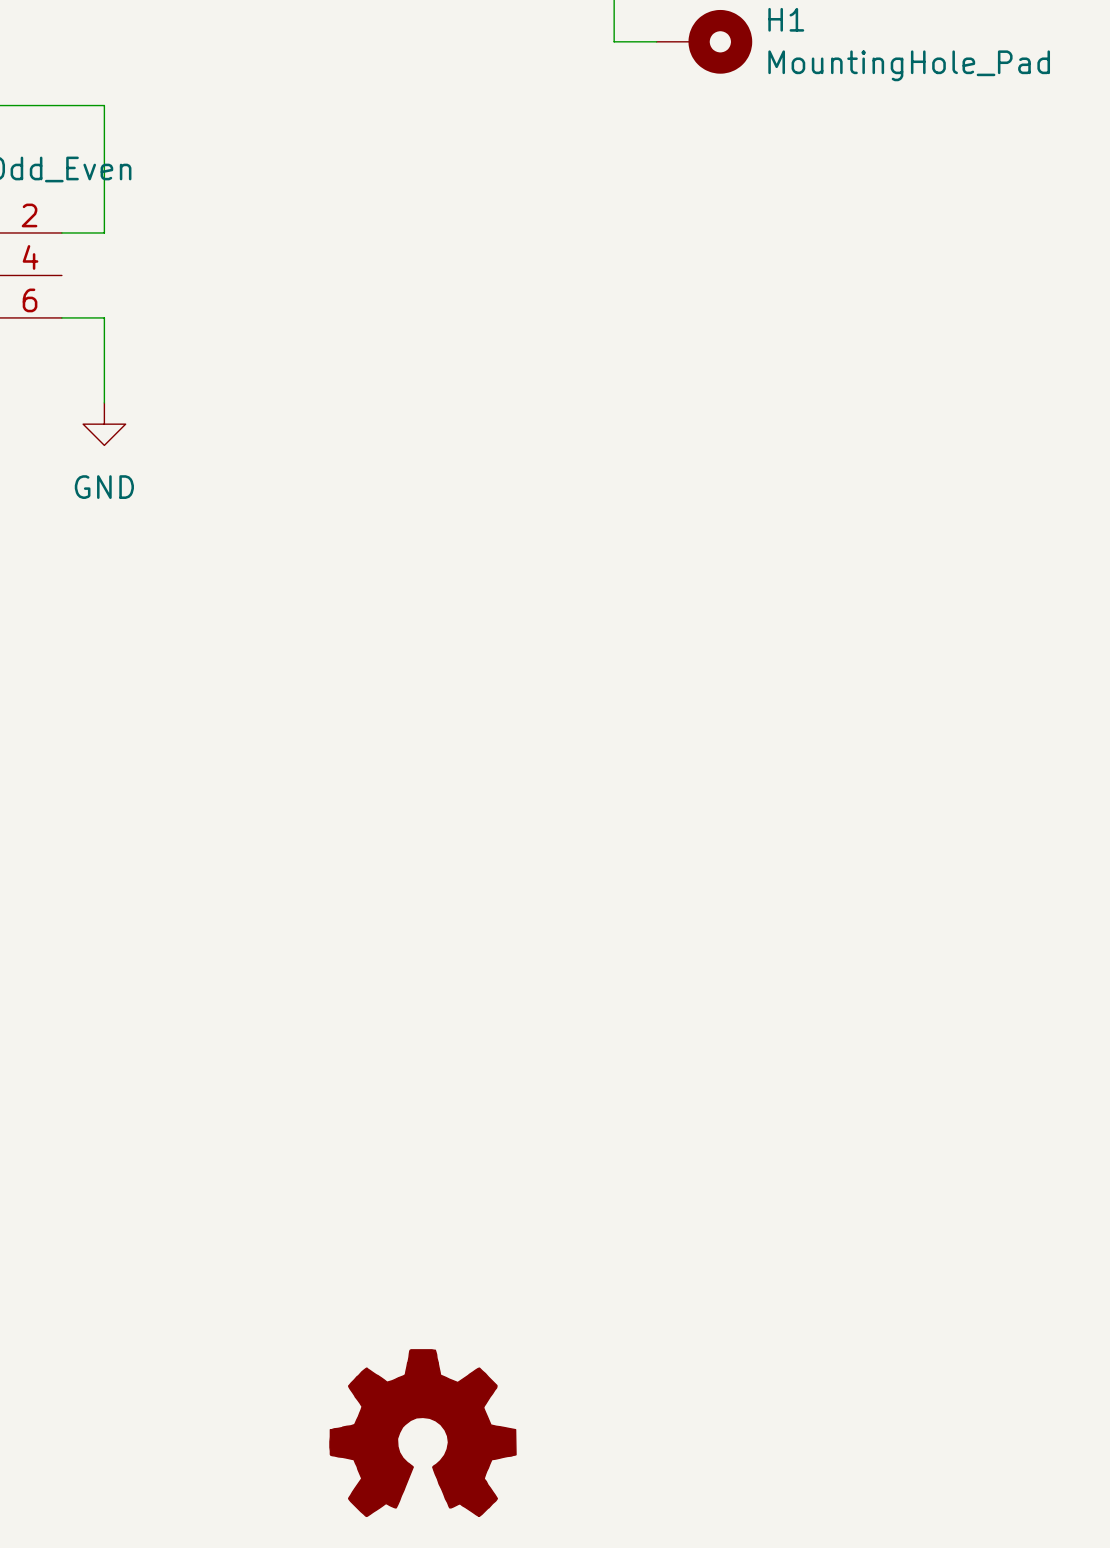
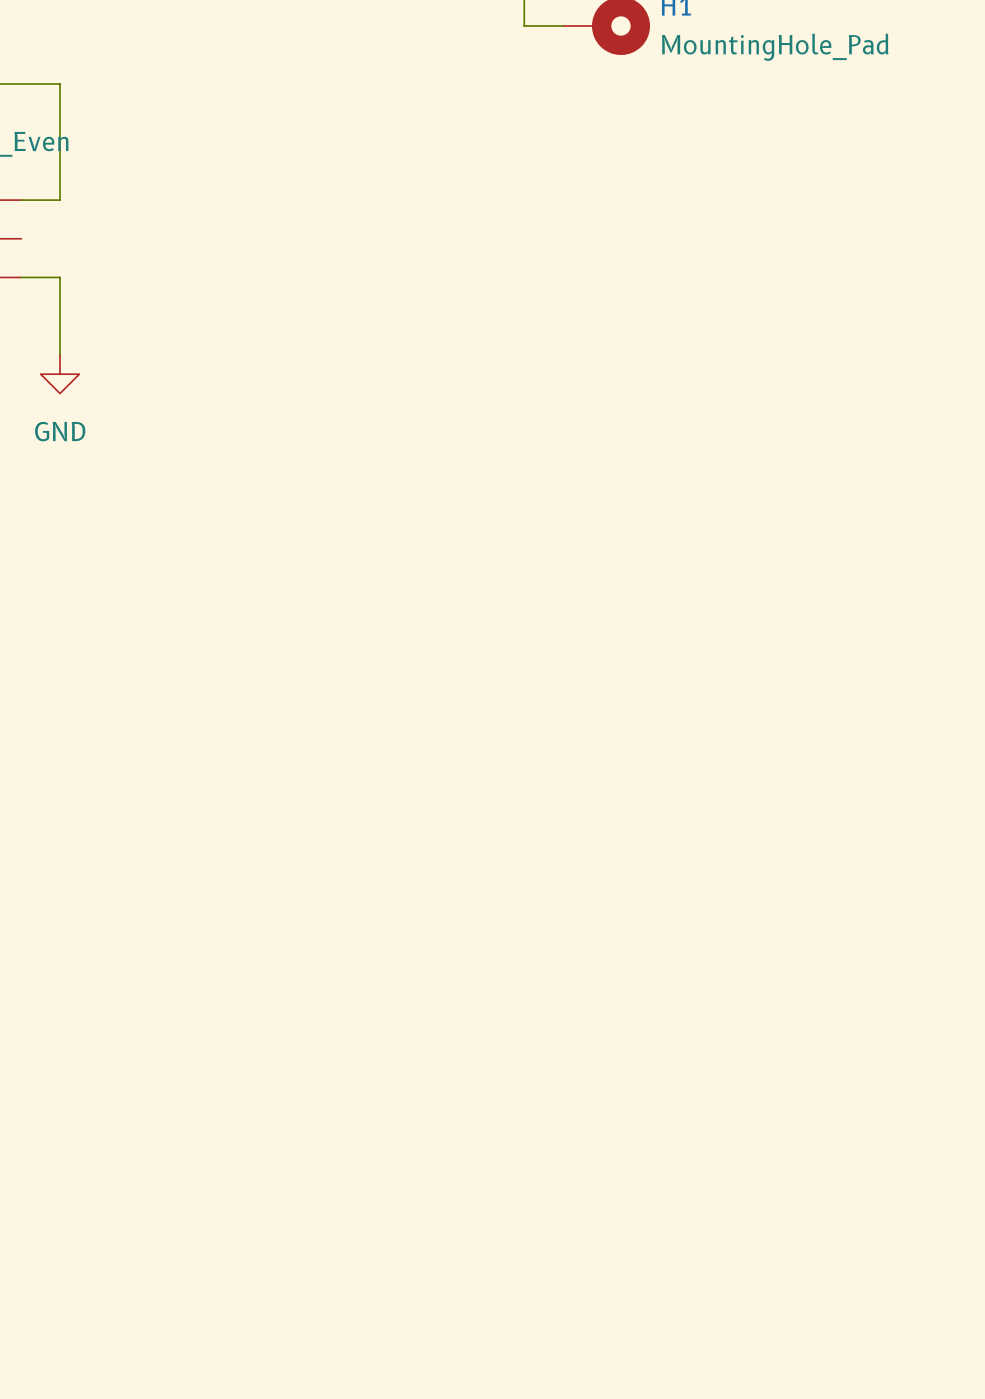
power symbol: (422, 1433) -> none

